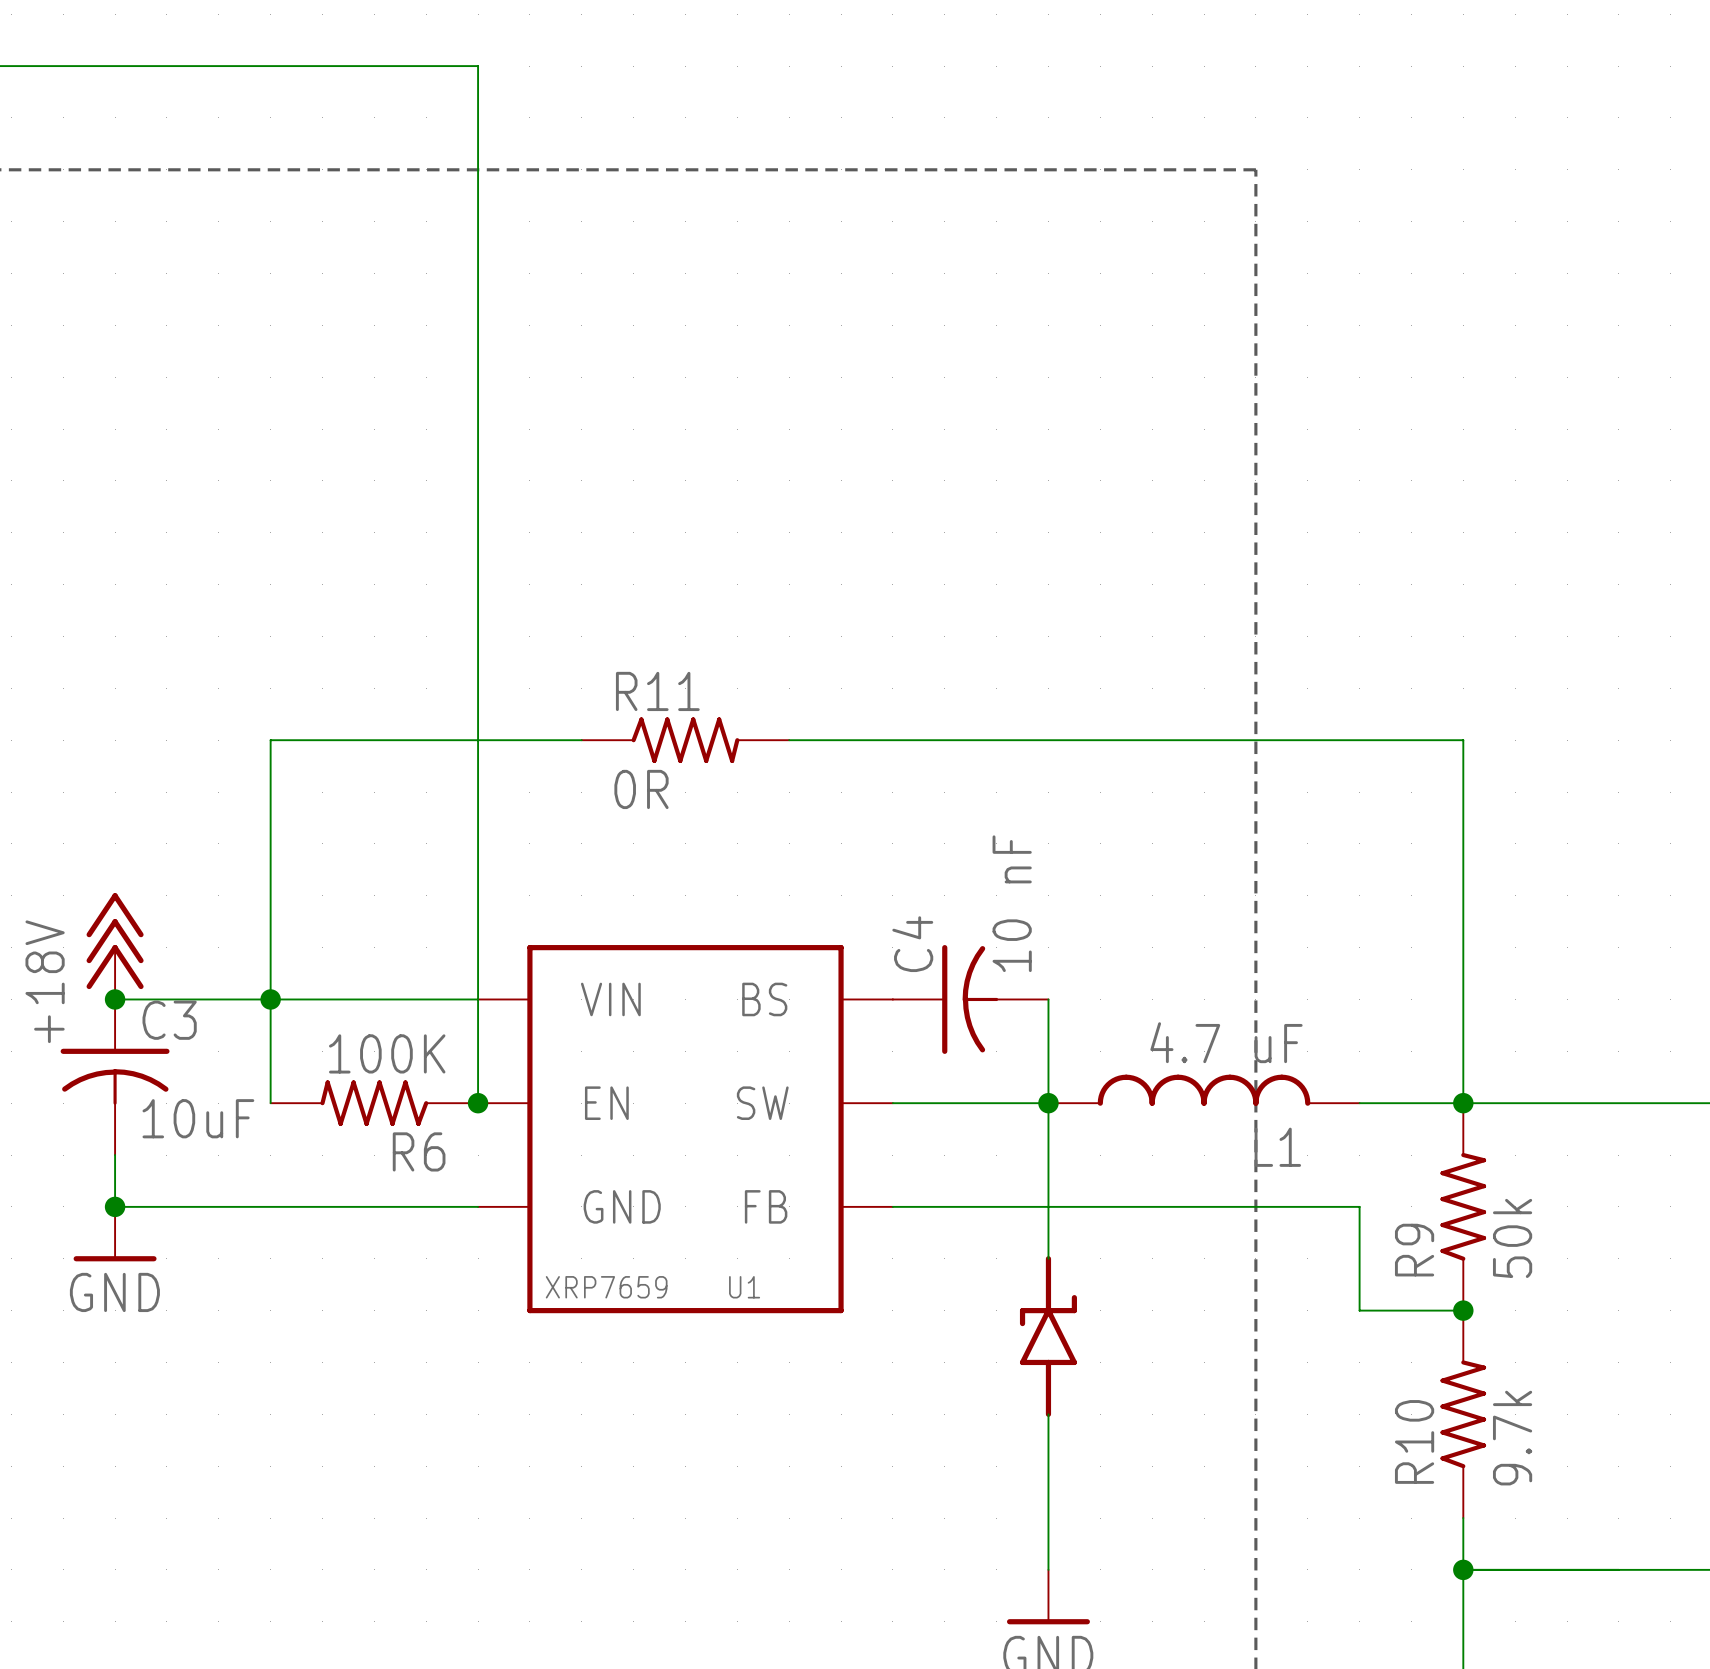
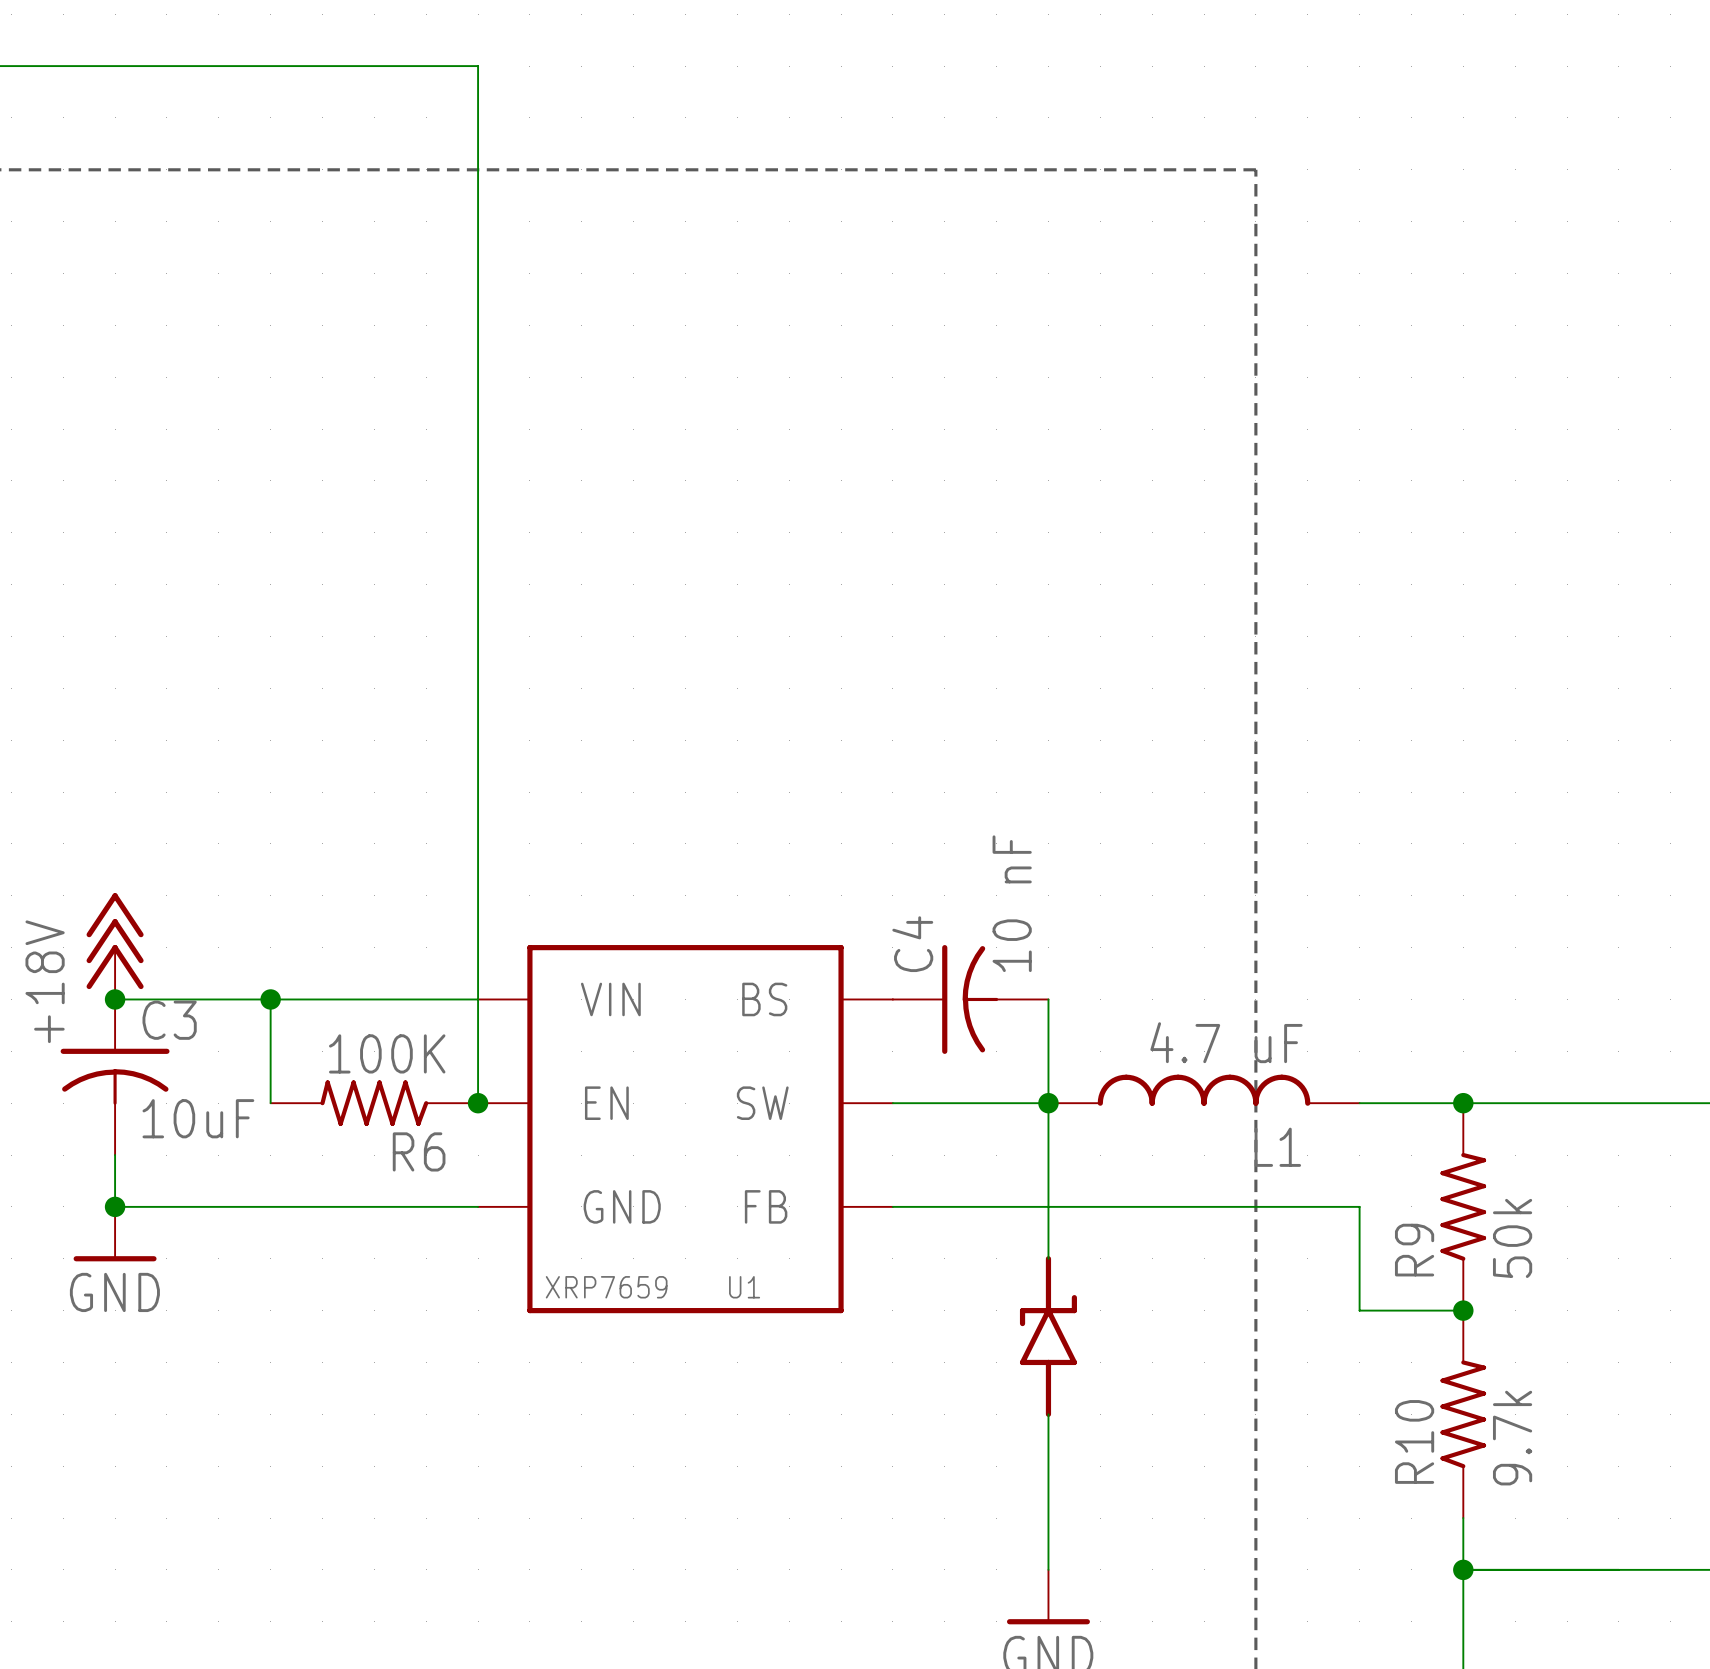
wire: (581, 740) (270, 740) (270, 999) -> none
R11: 0R (685, 740) -> none
wire: (789, 740) (1463, 740) (1463, 1103) -> none

